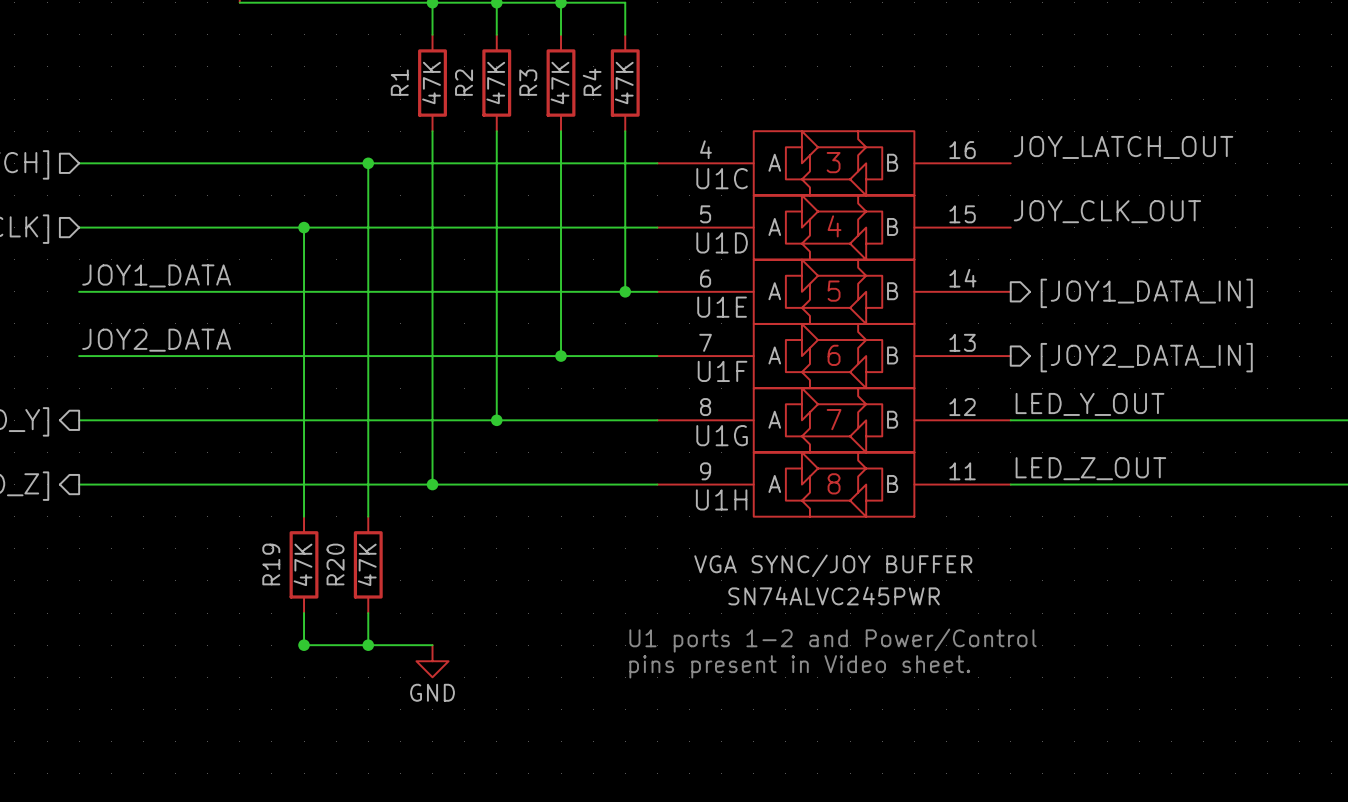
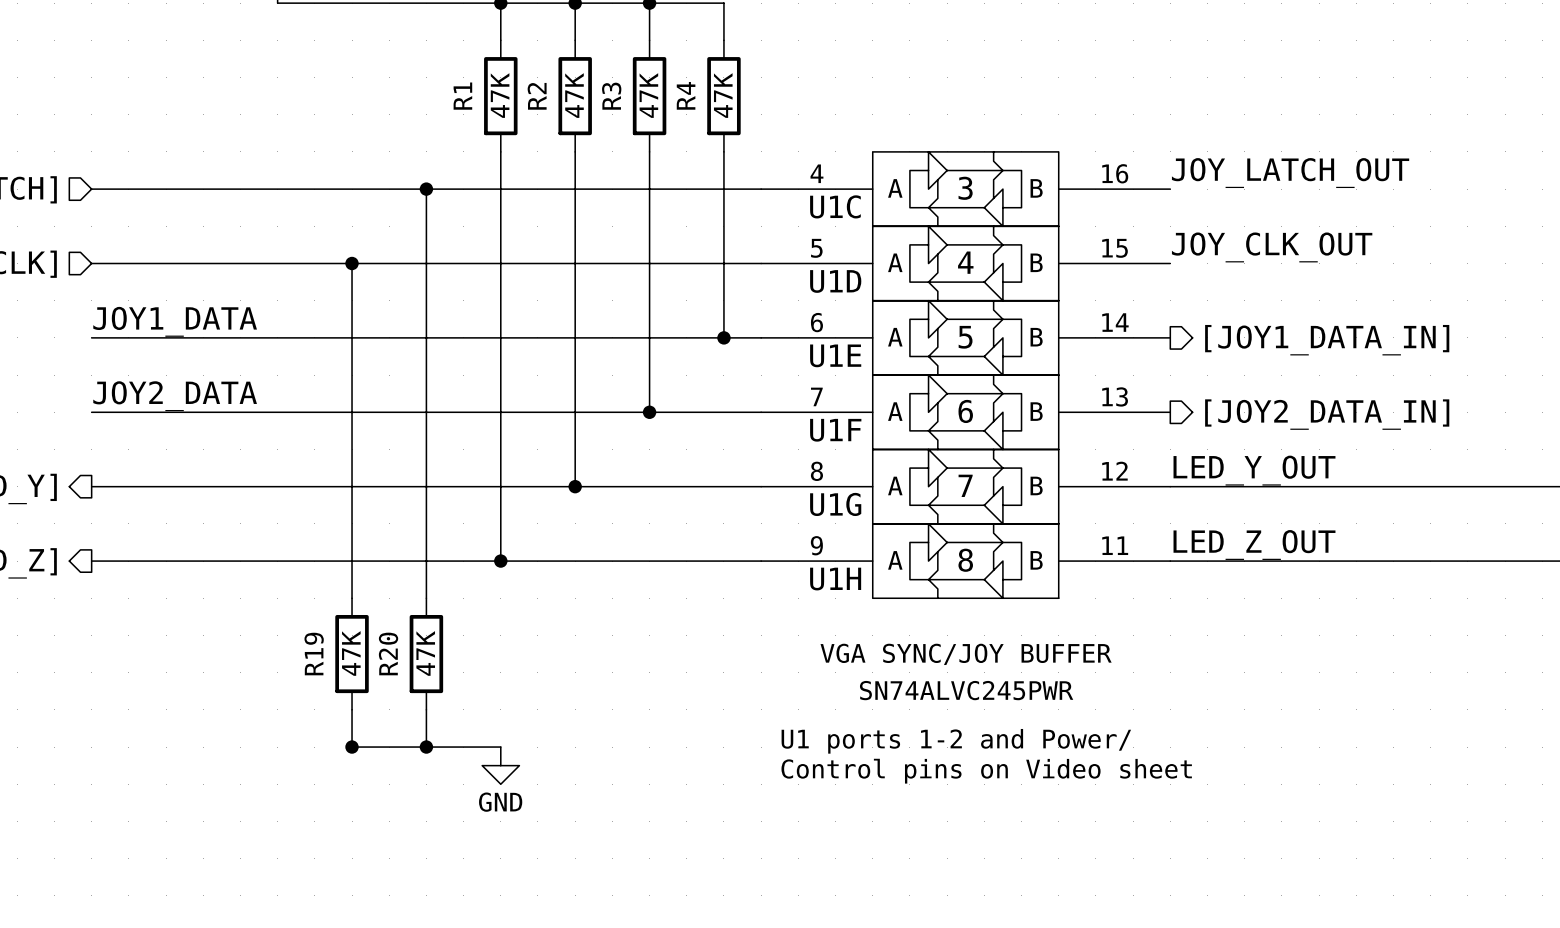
text: U1 ports 1-2 and Power/Control (833, 640) -> U1 ports 1-2 and Power/ (956, 741)
text: pins present in Video sheet. (799, 666) -> Control pins on Video sheet (986, 771)

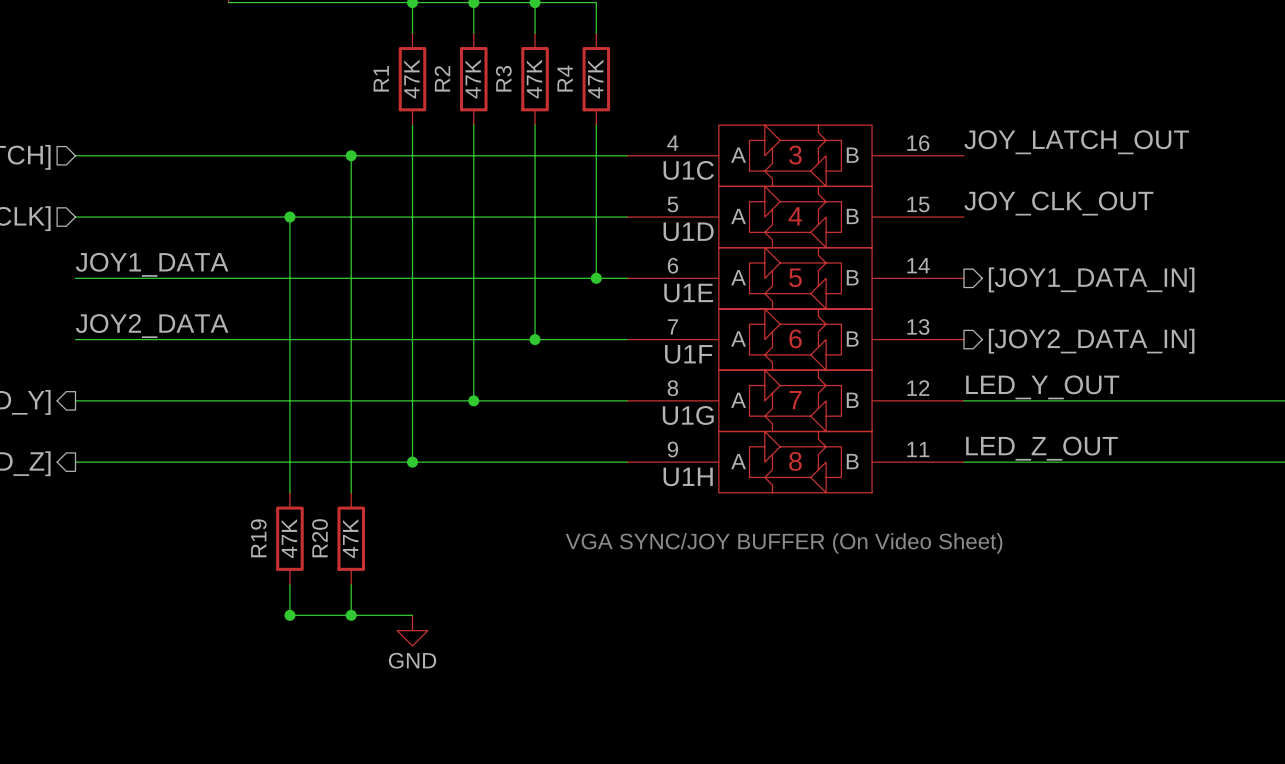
U1H value: VGA SYNC/JOY BUFFER (966, 654) -> none
text: none -> VGA SYNC/JOY BUFFER (On Video Sheet) (784, 543)
U1H text: SN74ALVC245PWR (966, 690) -> none
text: U1 ports 1-2 and Power/ (956, 741) -> none
text: Control pins on Video sheet (986, 771) -> none

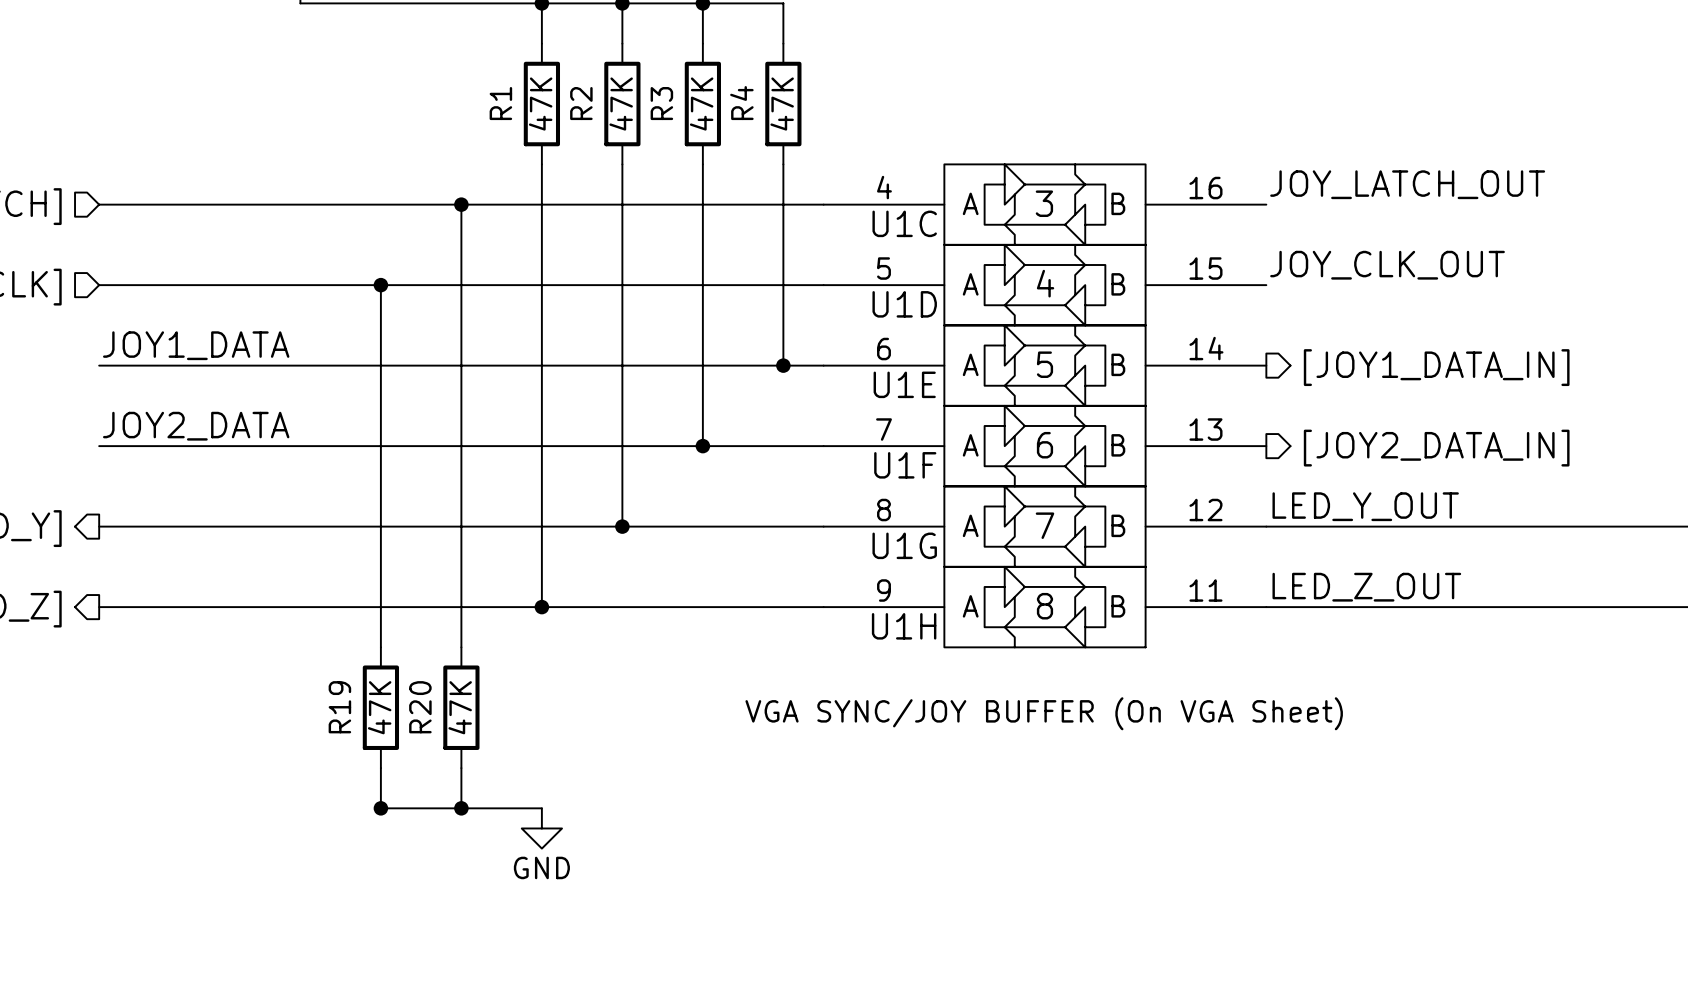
text: VGA SYNC/JOY BUFFER (On Video Sheet) (784, 543) -> VGA SYNC/JOY BUFFER (On VGA Sheet) (1044, 713)

